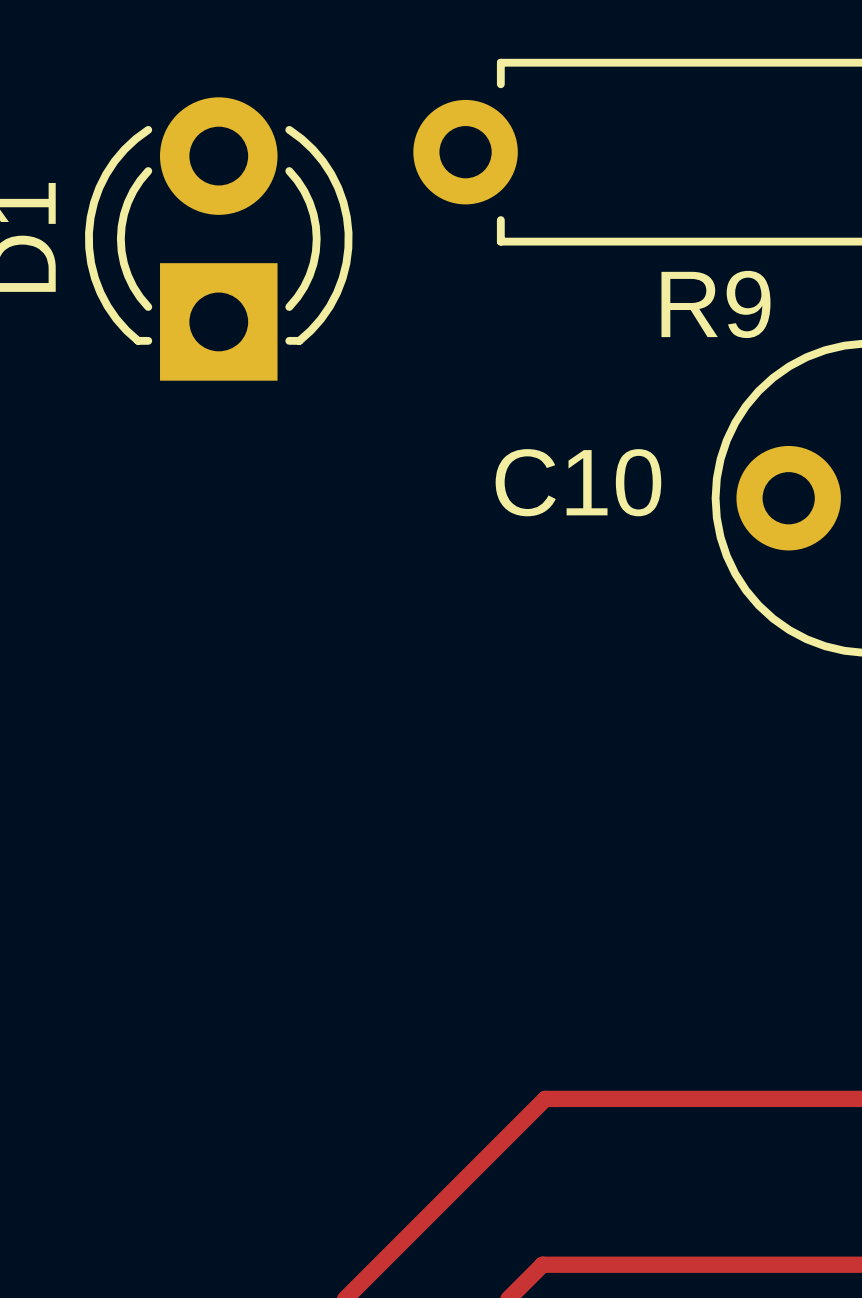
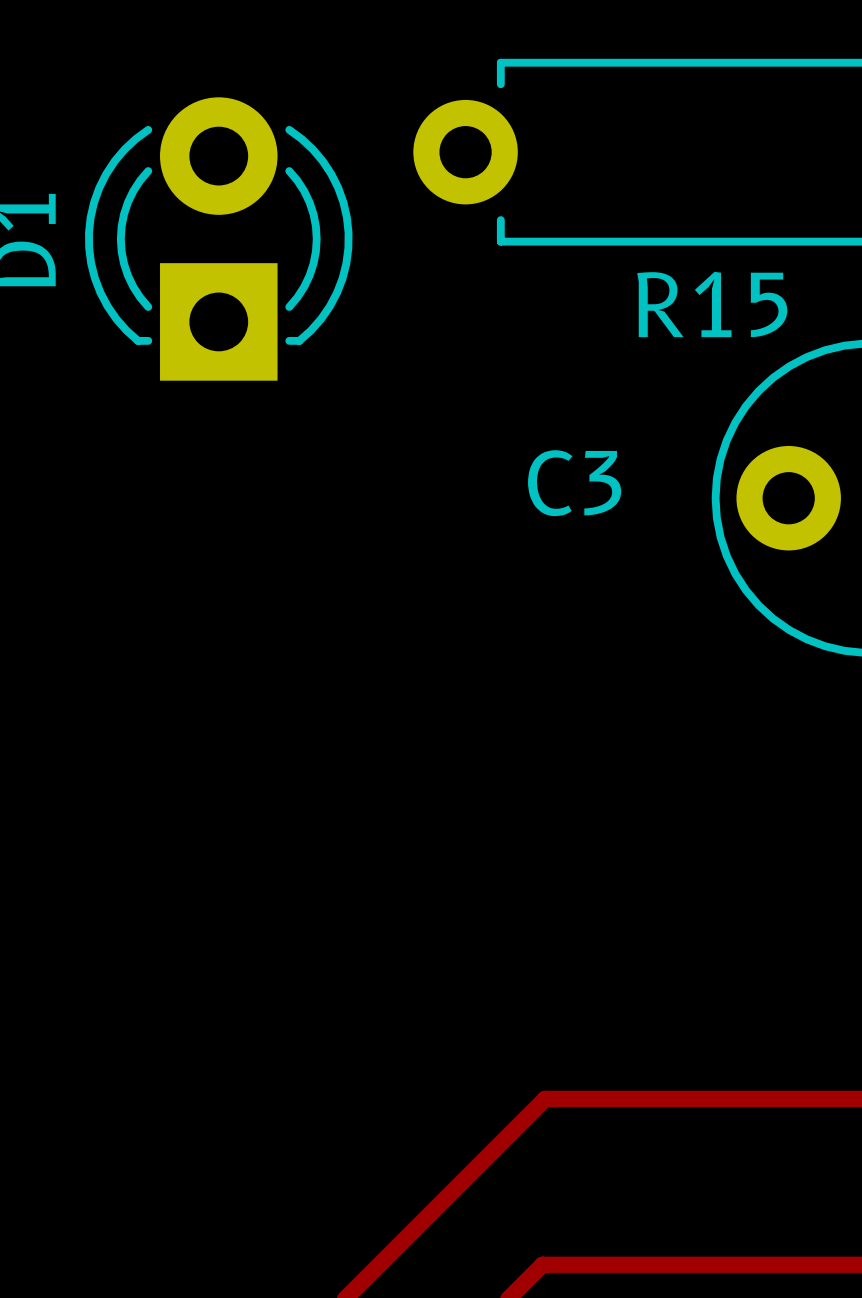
R9 name: R9 (715, 304) -> R15 (712, 304)
C10 name: C10 (578, 482) -> C3 (574, 483)

